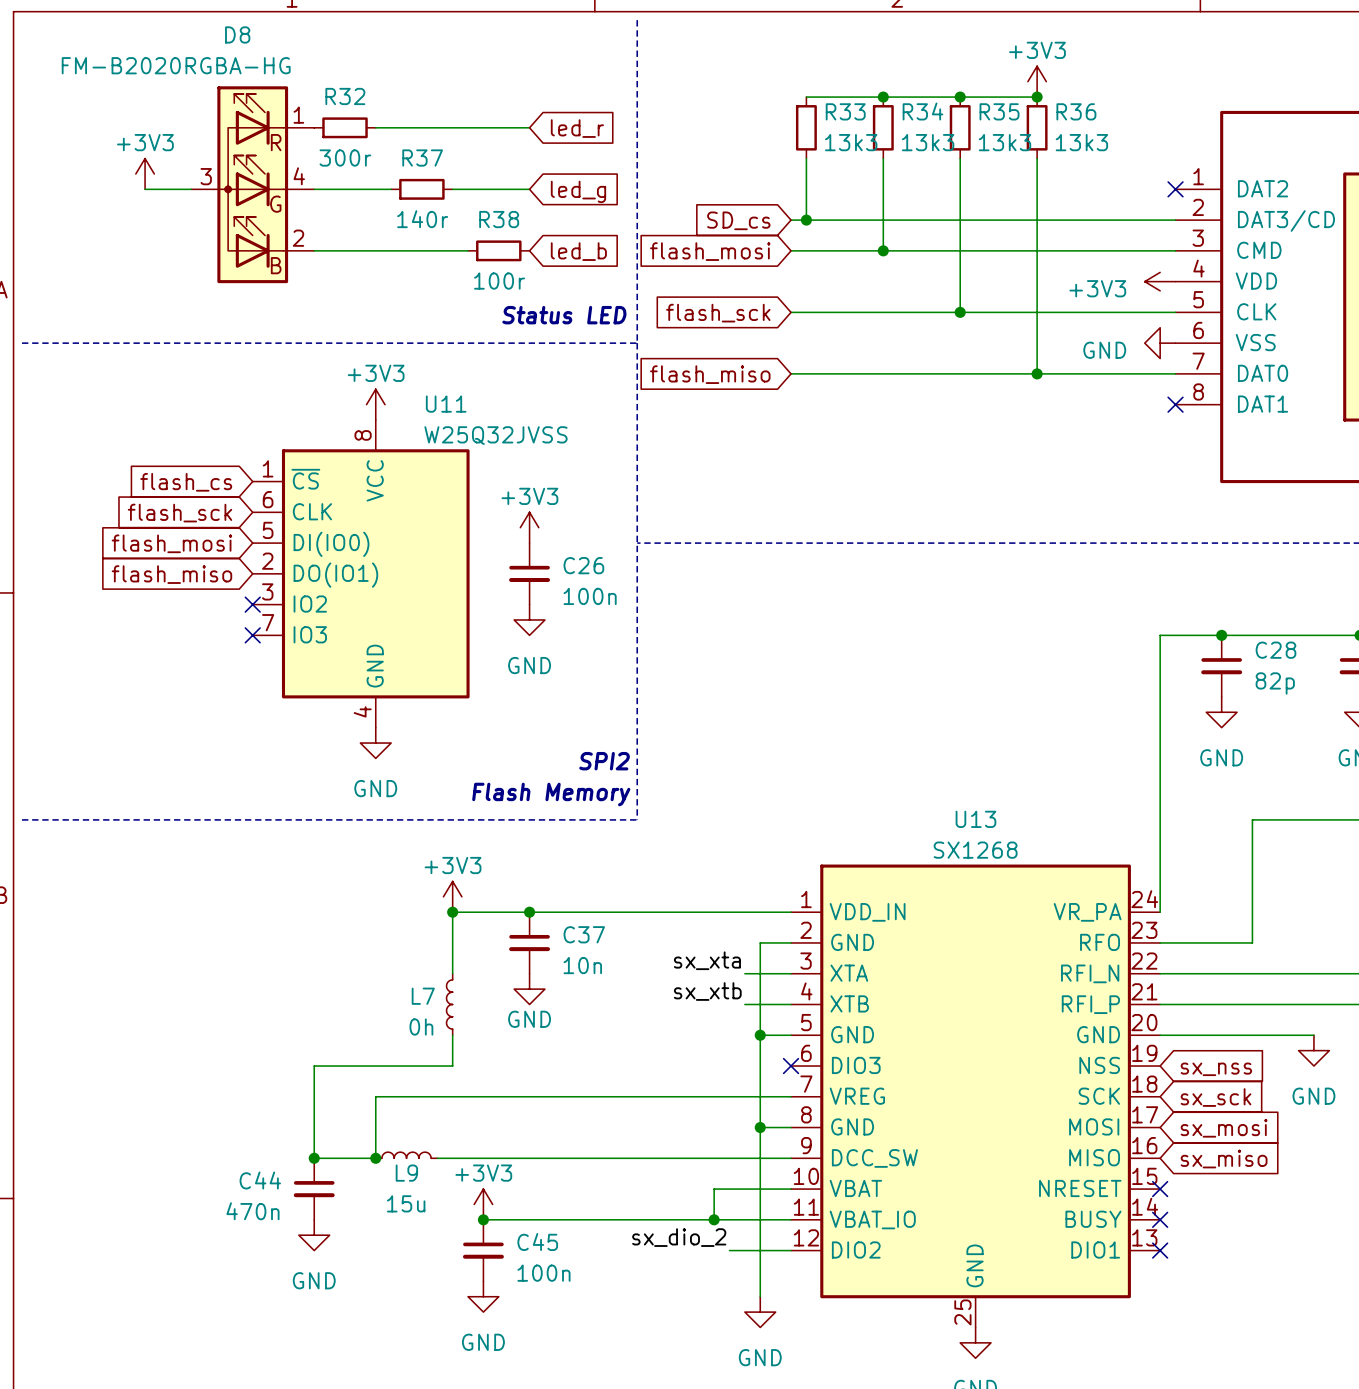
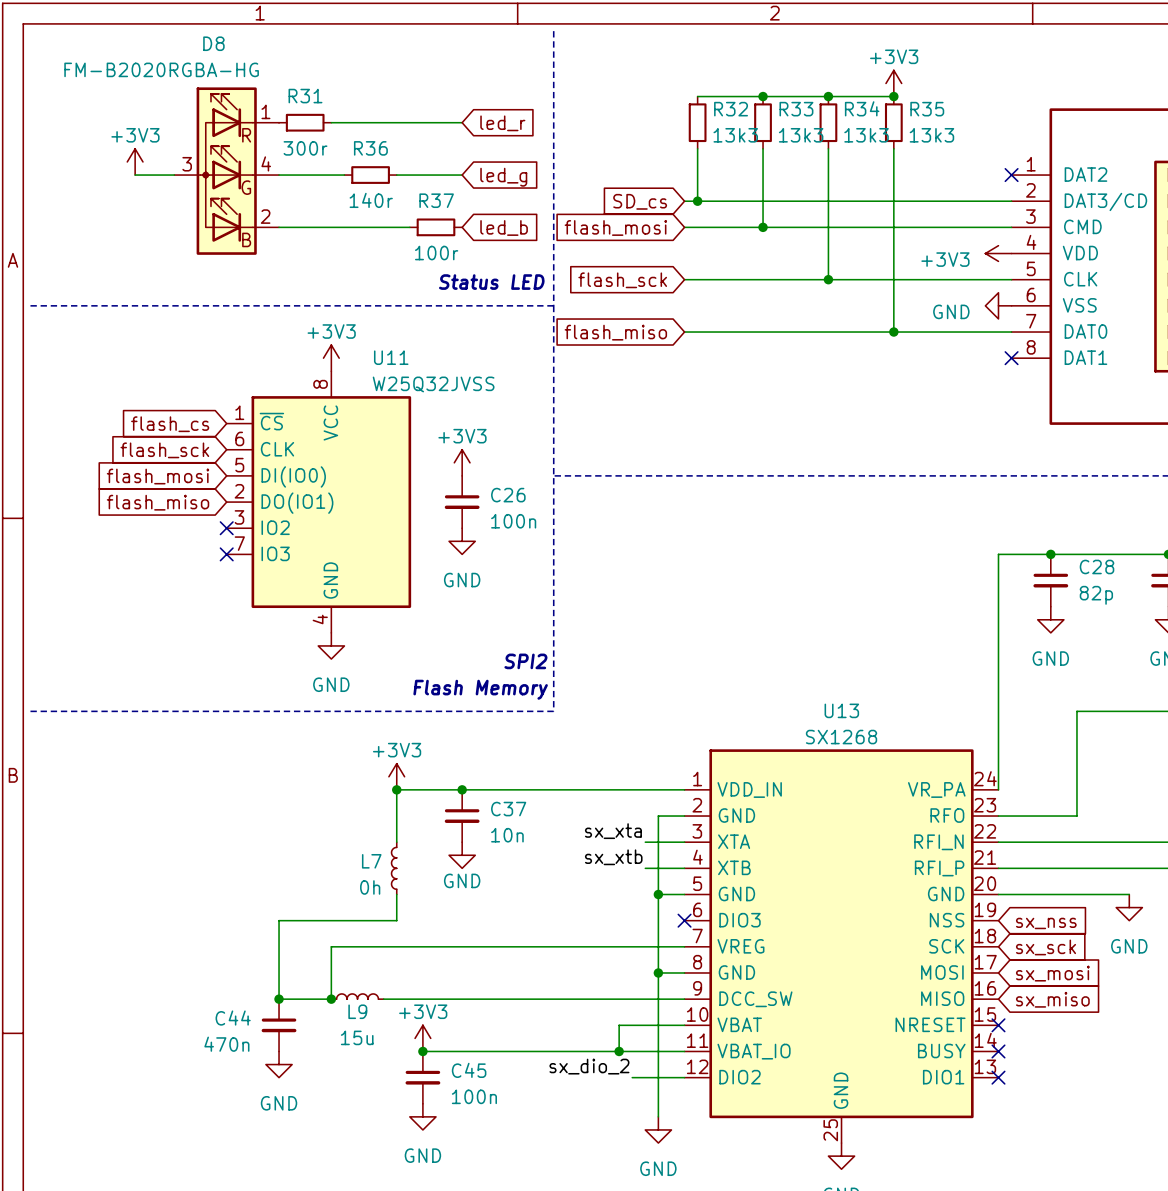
R32 name: R32 (345, 96) -> R31 (305, 96)
R33 name: R33 (845, 111) -> R32 (731, 109)
R34 name: R34 (922, 111) -> R33 (796, 109)
R35 name: R35 (999, 111) -> R34 (862, 108)
R36 name: R36 (1076, 111) -> R35 (927, 109)
R37 name: R37 (422, 158) -> R36 (370, 148)
R38 name: R38 (499, 219) -> R37 (436, 200)

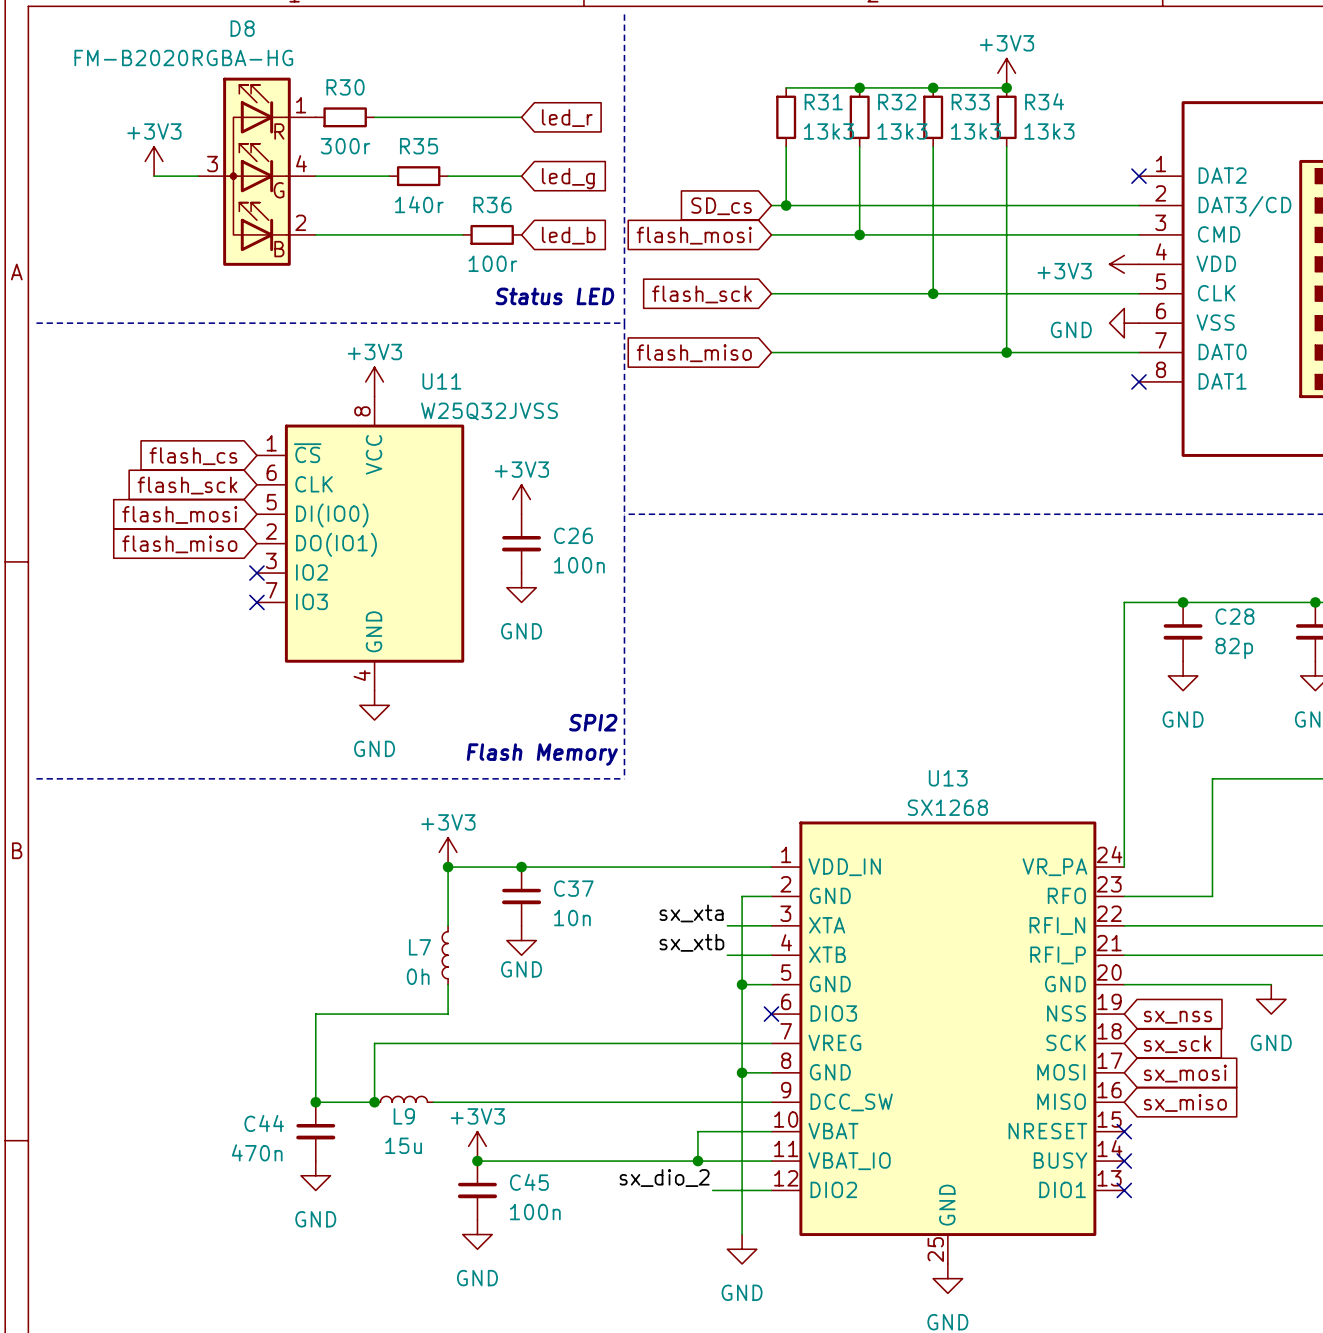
R31 name: R31 (305, 96) -> R30 (345, 87)
R34 name: R34 (862, 108) -> R33 (970, 102)
R32 name: R32 (731, 109) -> R31 (823, 102)
R33 name: R33 (796, 109) -> R32 (897, 102)
R35 name: R35 (927, 109) -> R34 (1044, 101)
R36 name: R36 (370, 148) -> R35 (419, 146)
R37 name: R37 (436, 200) -> R36 (492, 204)

